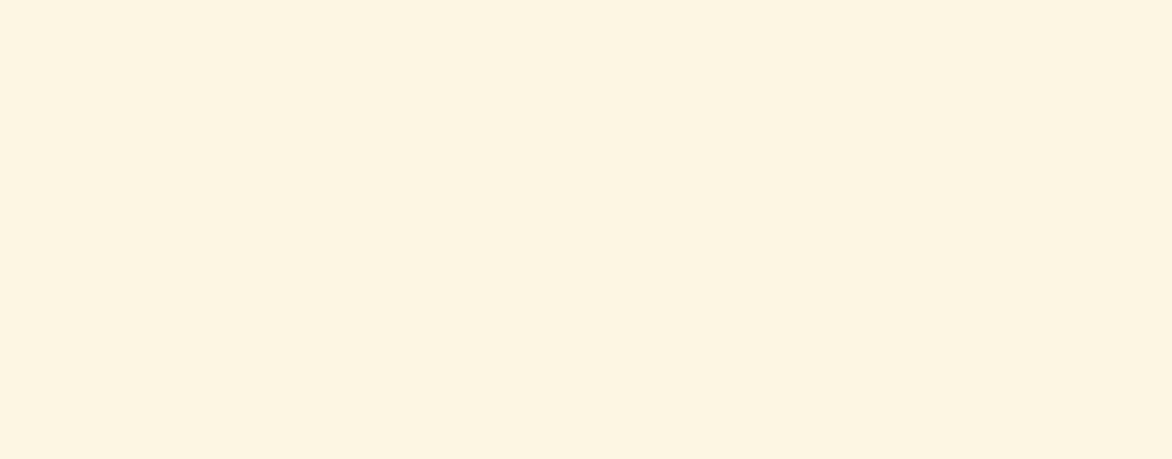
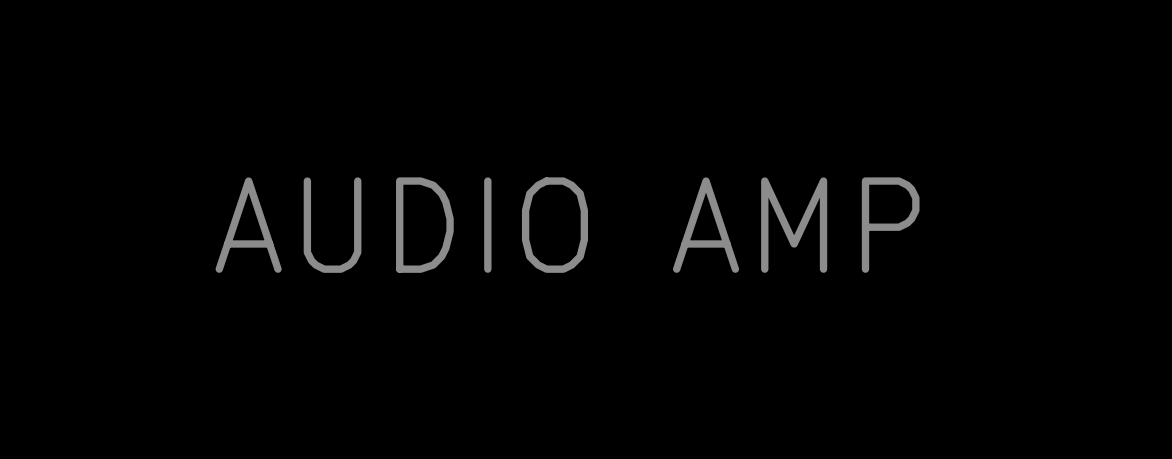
text: none -> AUDIO AMP (567, 225)

